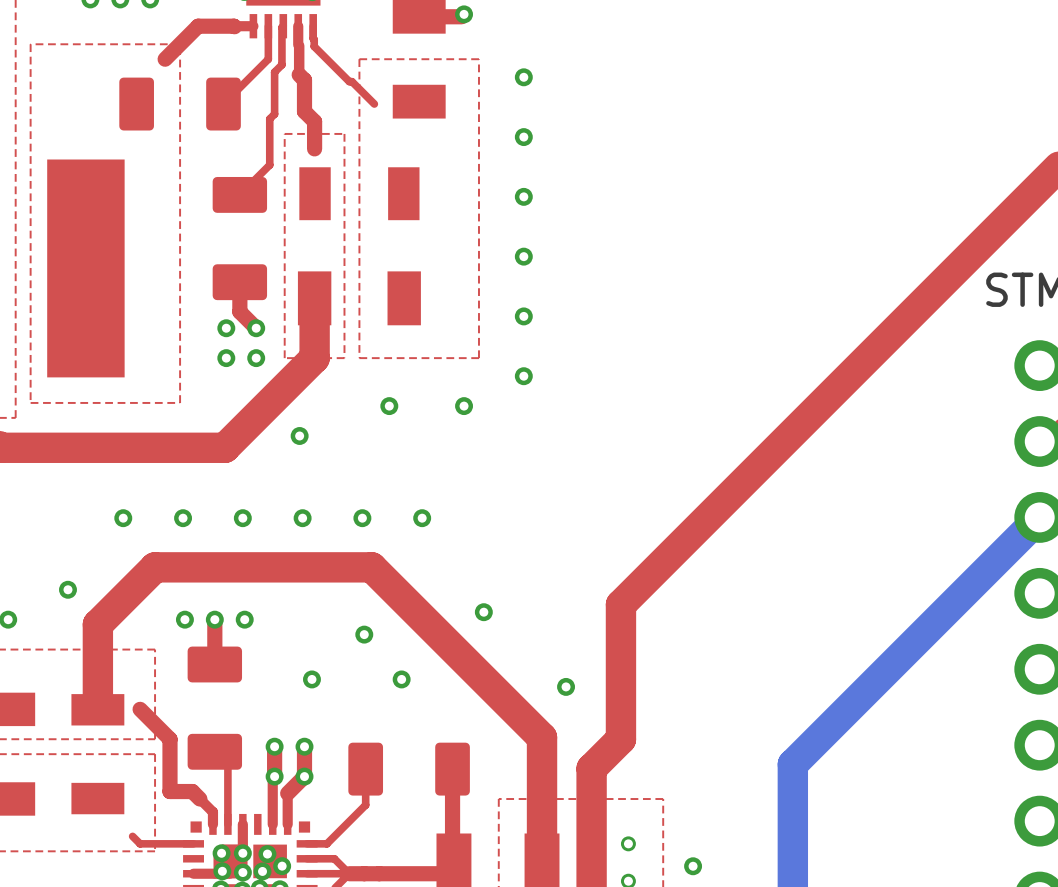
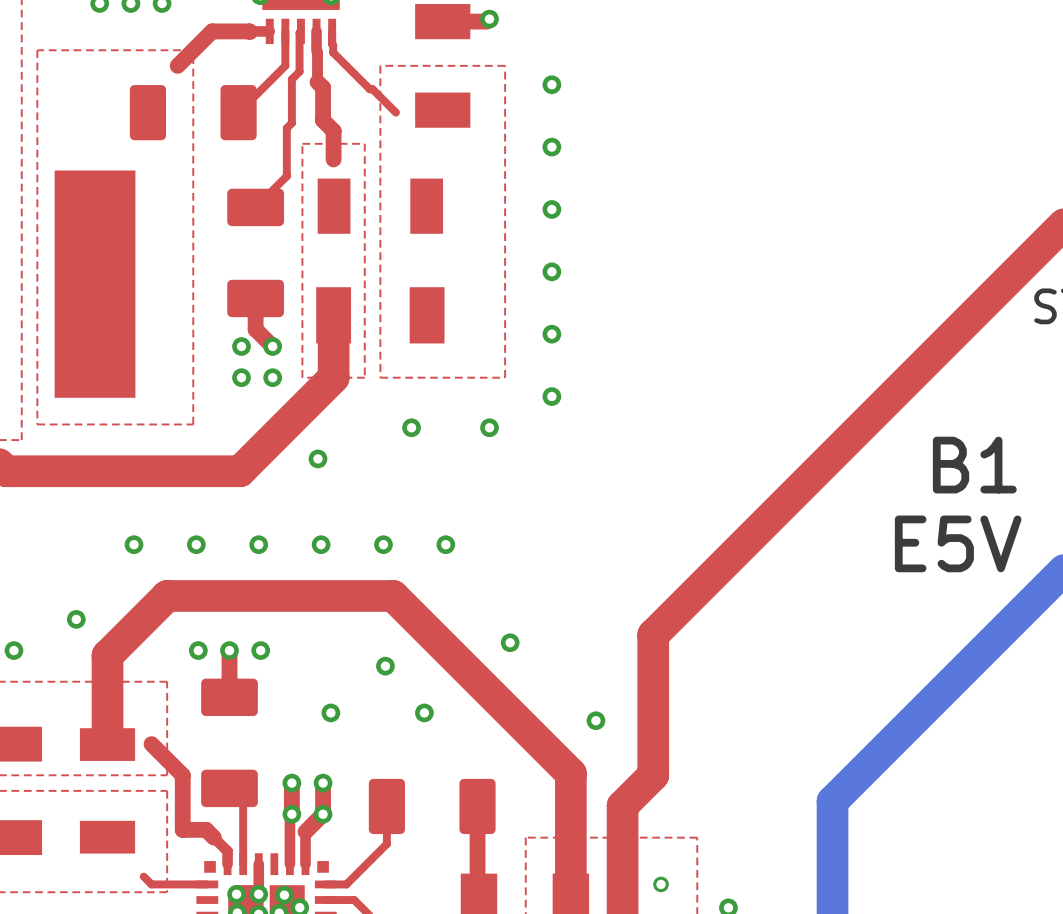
text: none -> B1 (974, 465)
text: none -> E5V (958, 543)

